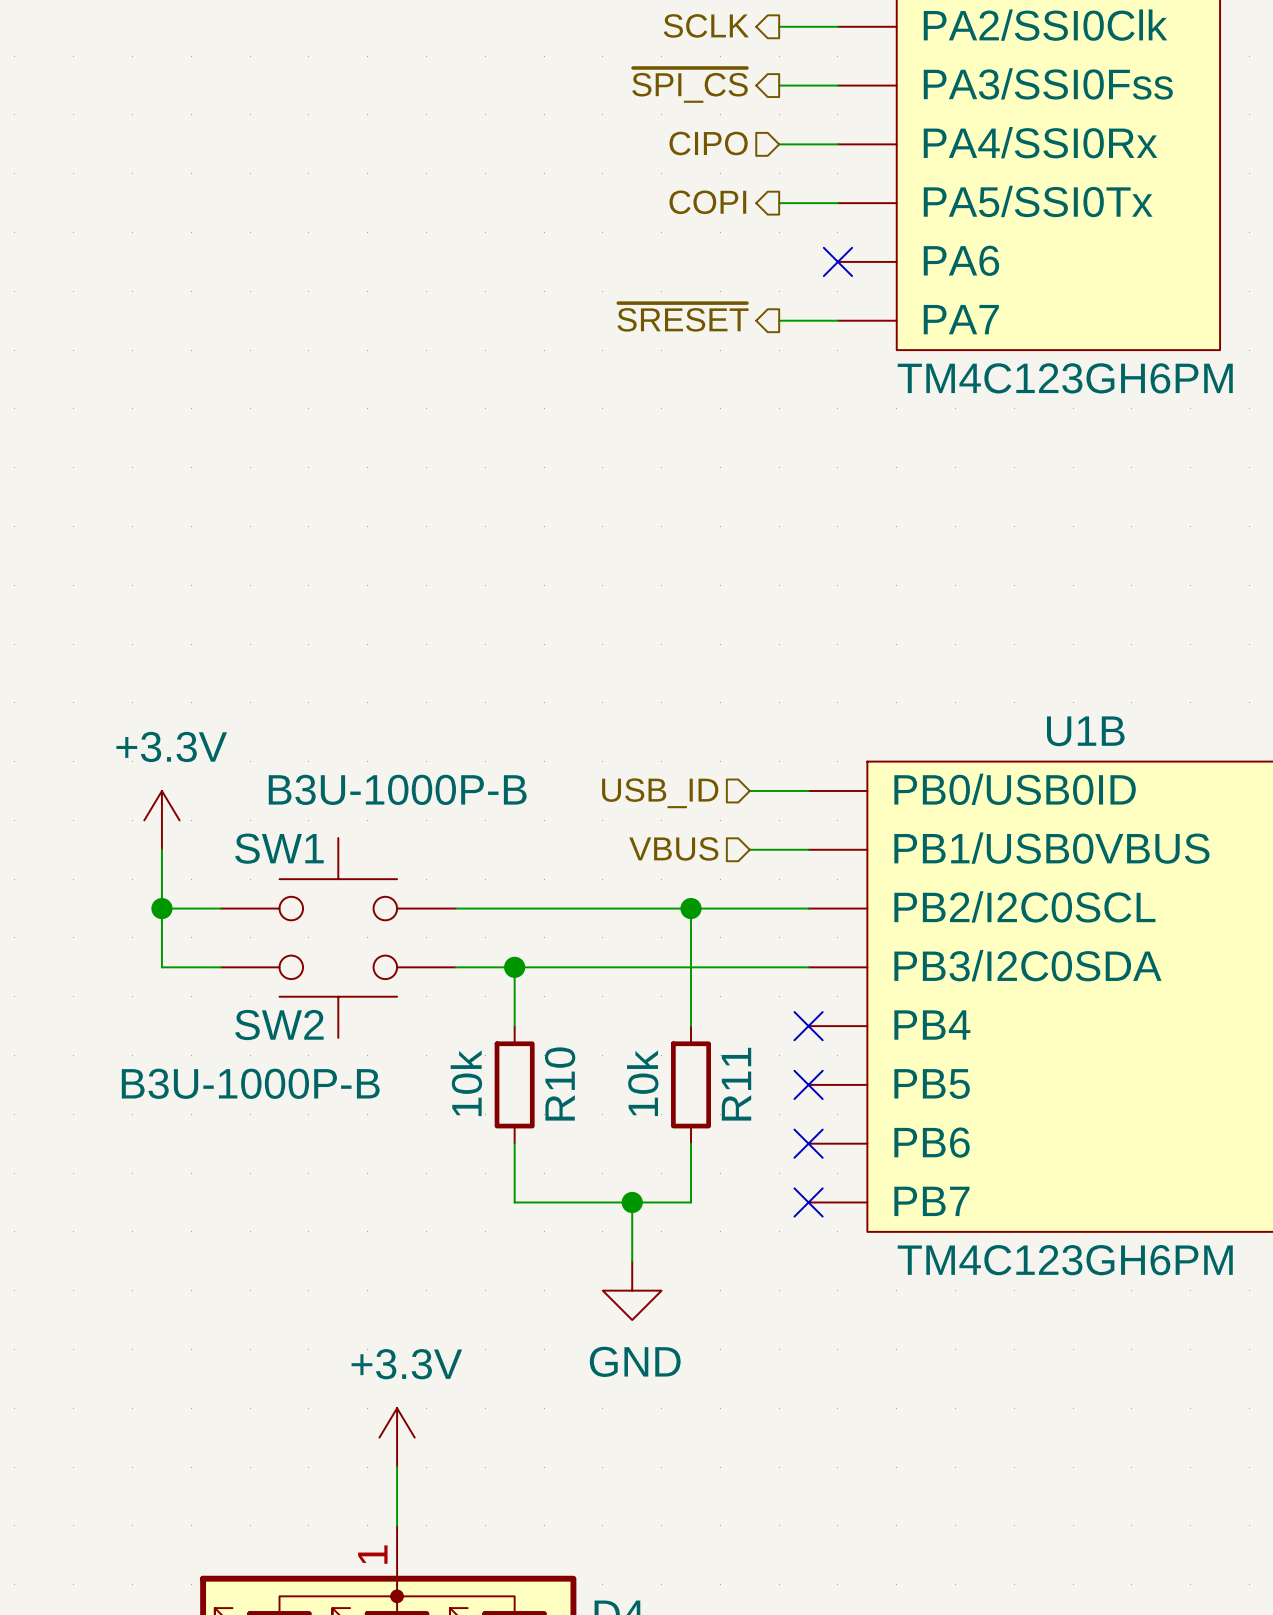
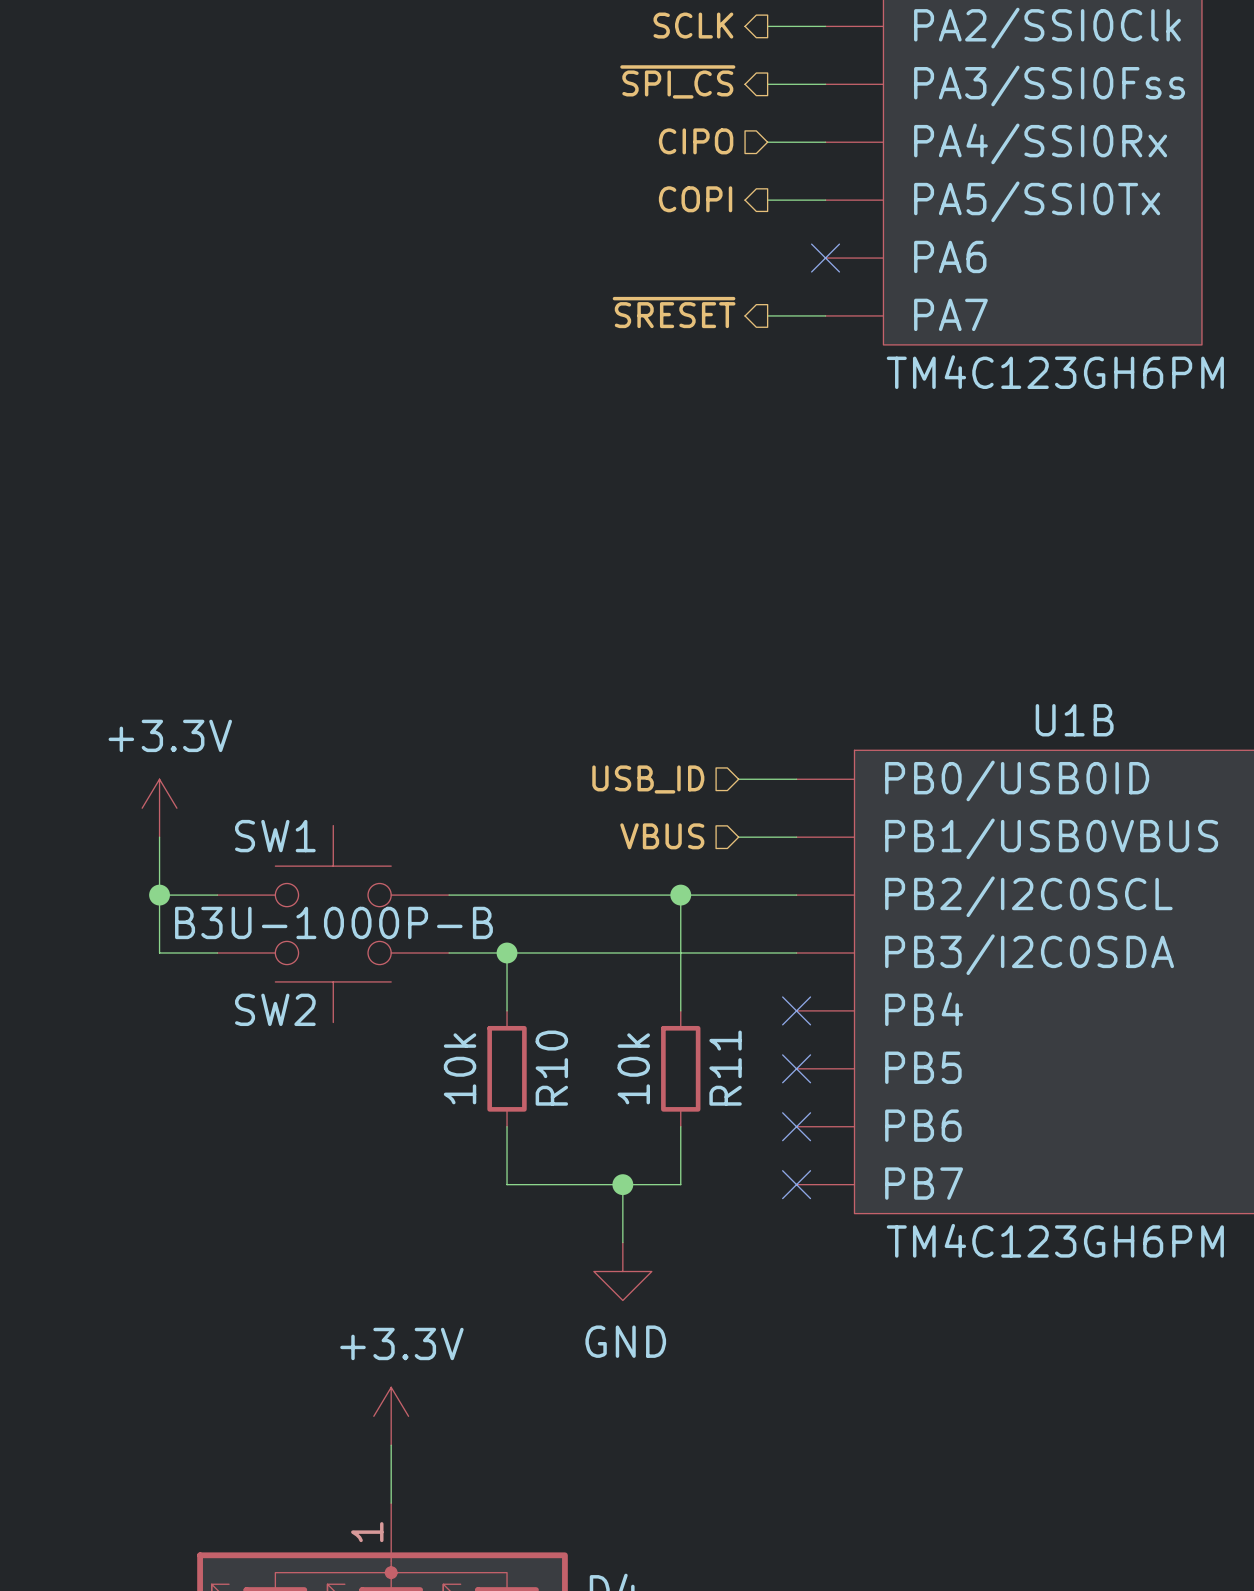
SW1 value position: B3U-1000P-B (397, 789) -> B3U-1000P-B (333, 922)
SW2 value: B3U-1000P-B (250, 1083) -> none

